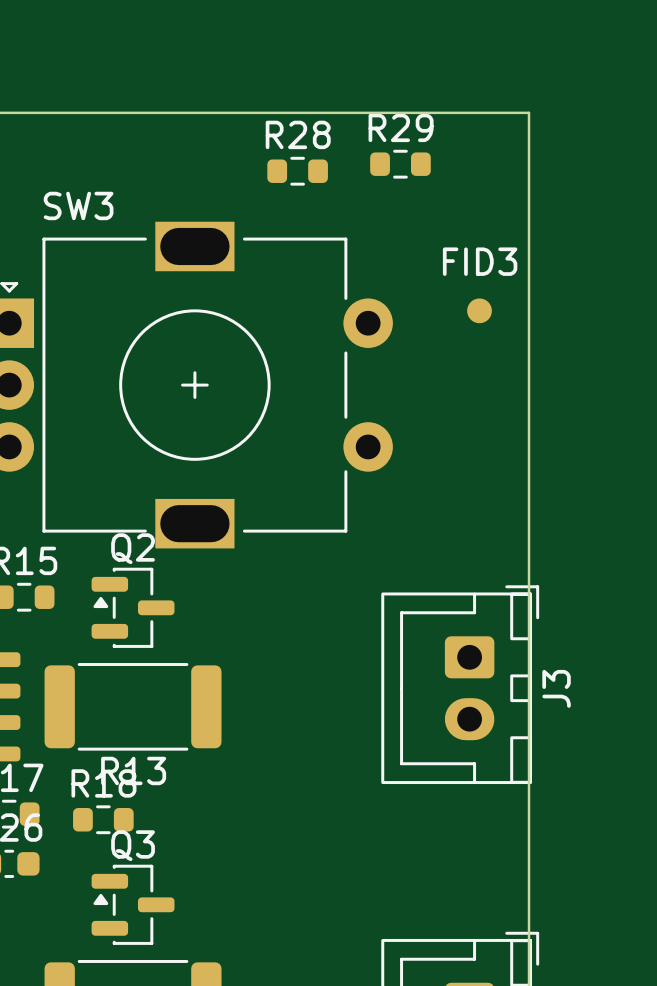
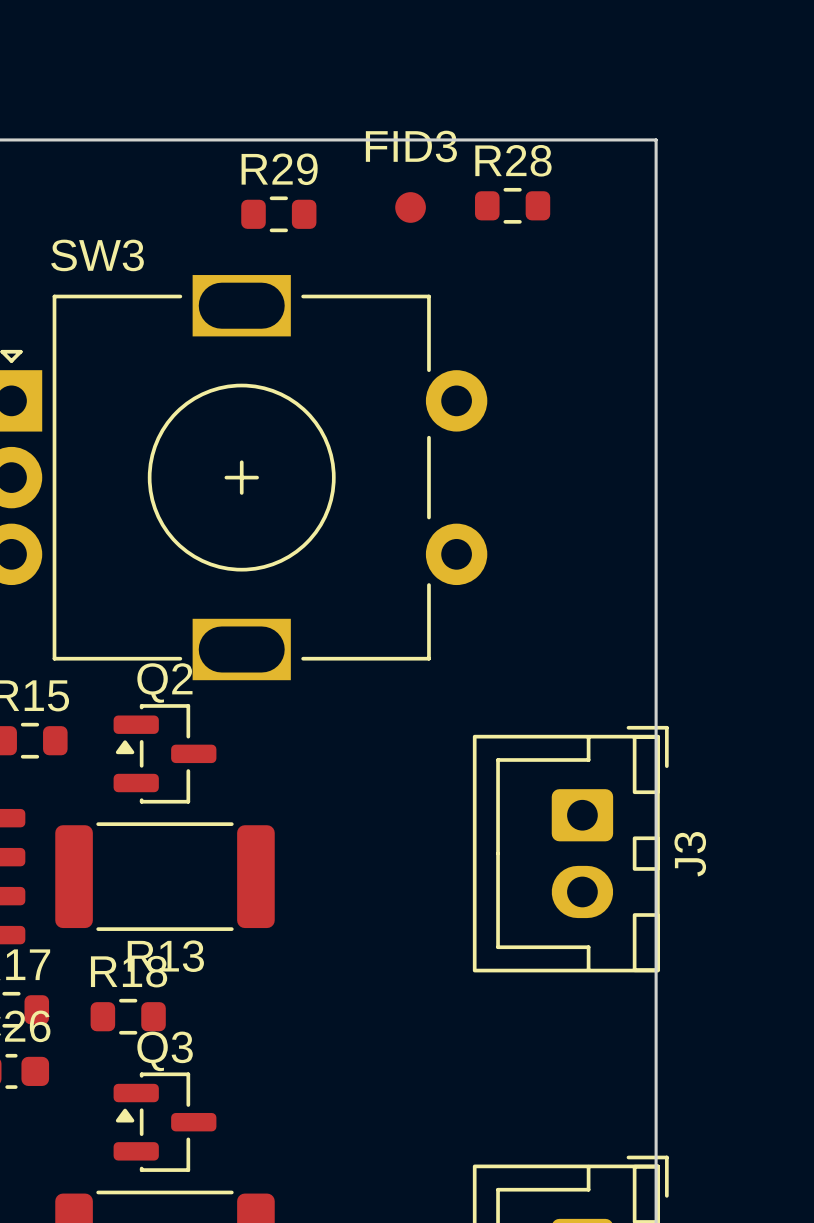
R29 position: (400, 164) -> (278, 214)
R28 position: (297, 171) -> (512, 205)
FID3 position: (479, 310) -> (410, 207)

